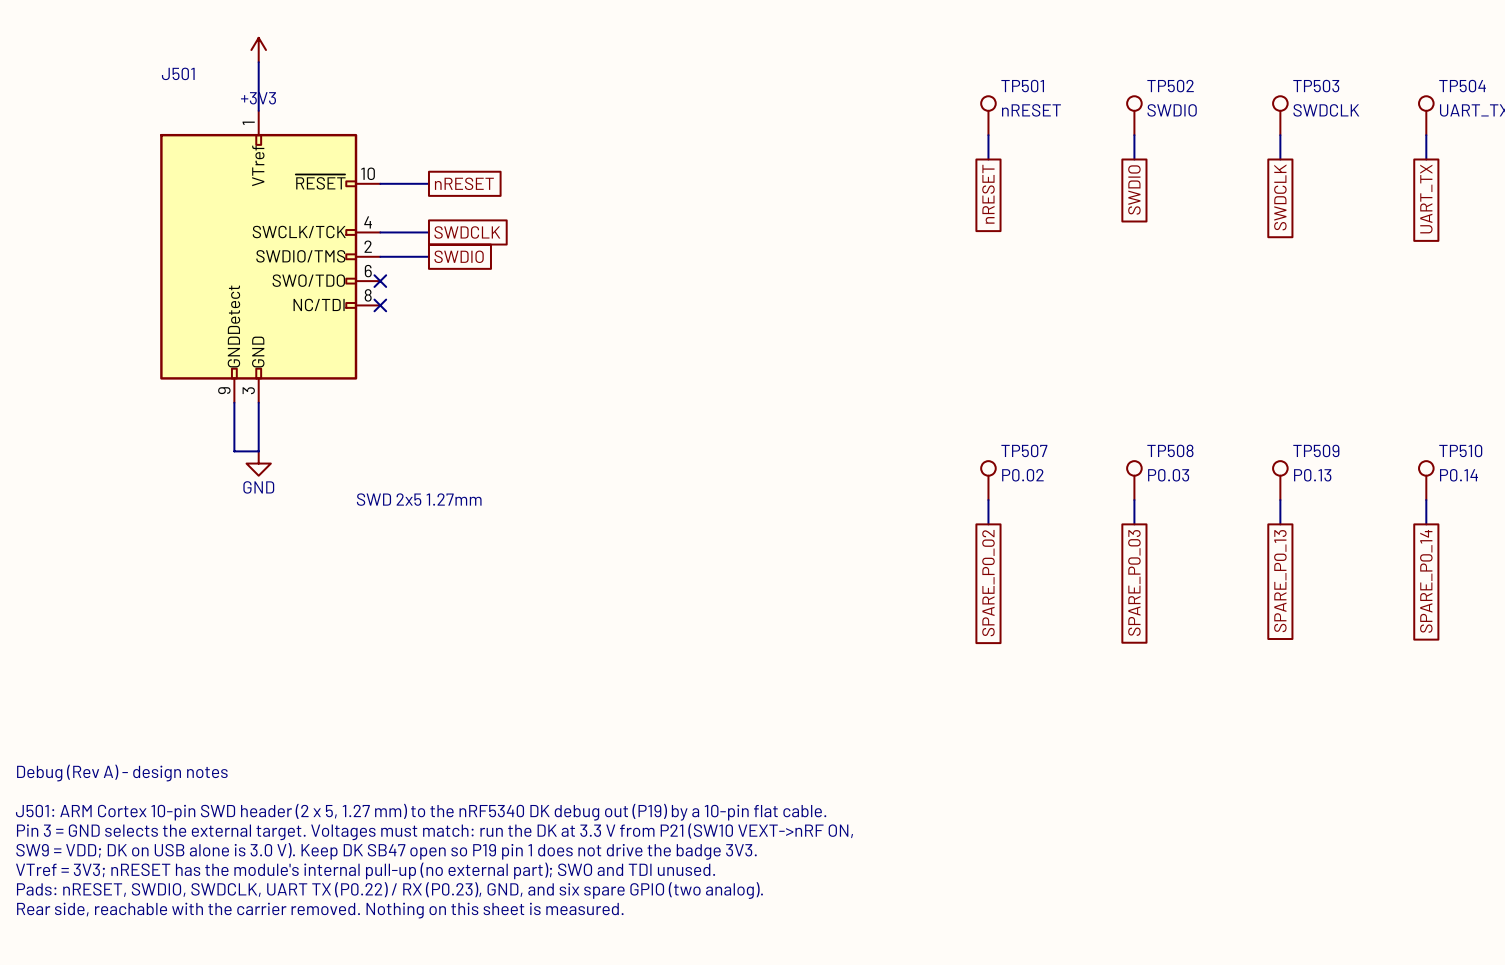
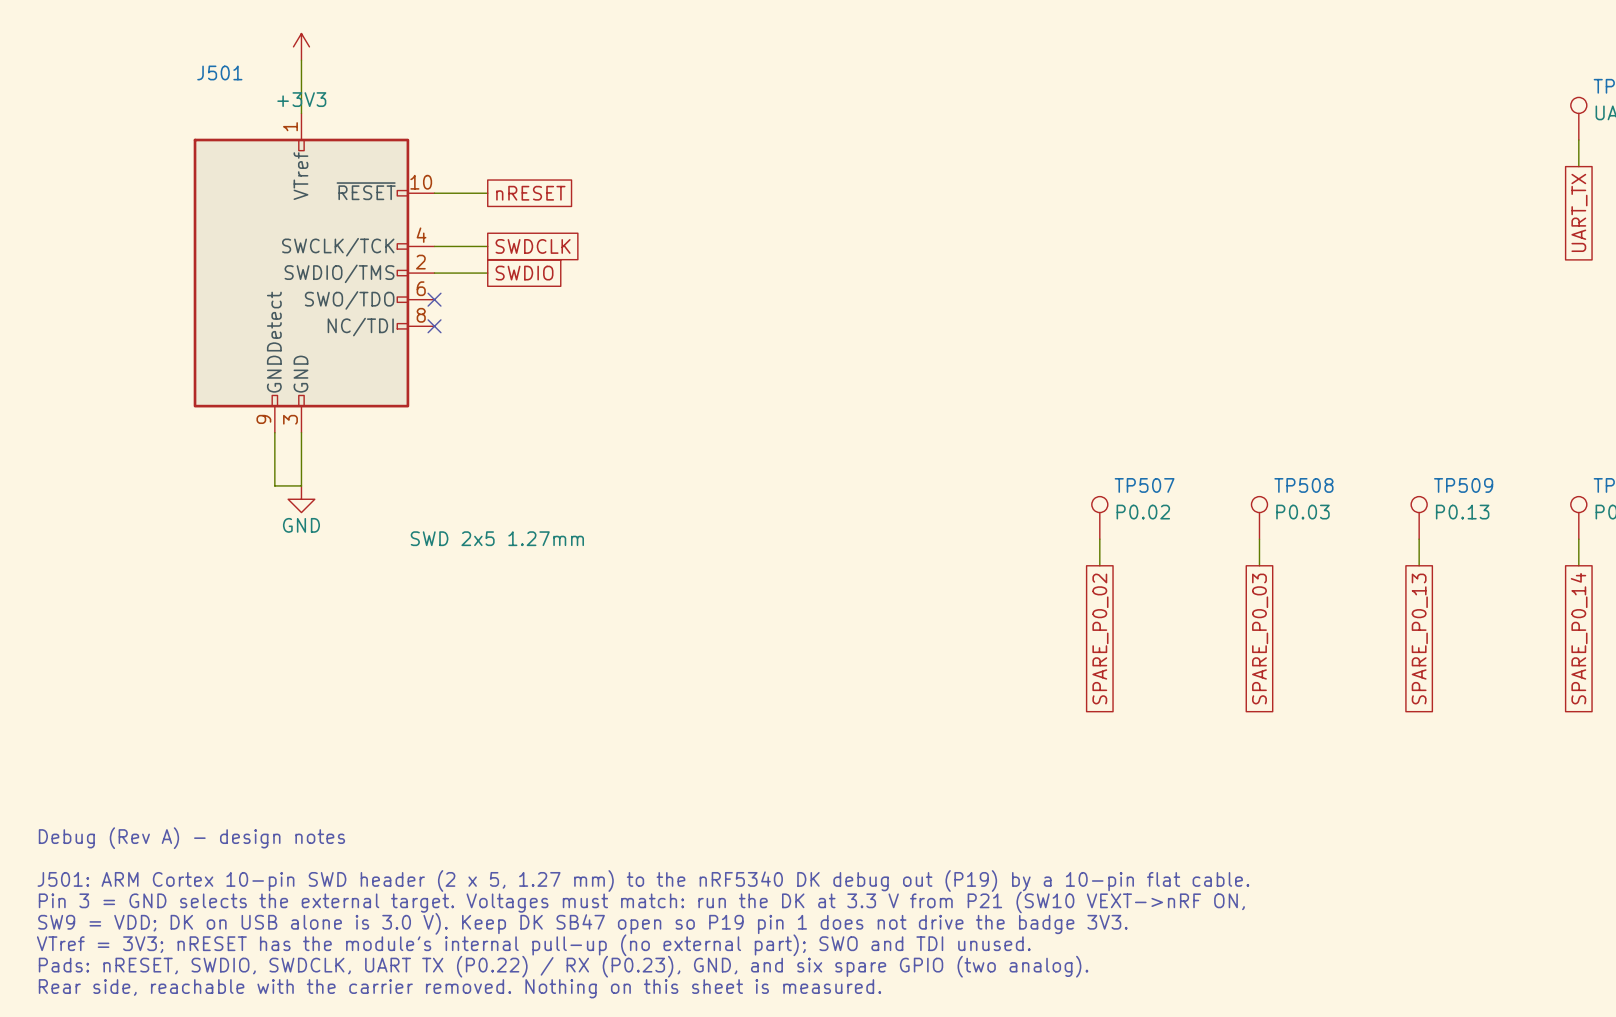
TP501: nRESET (988, 115) -> none
TP502: SWDIO (1134, 115) -> none
TP503: SWDCLK (1280, 115) -> none
wire: (988, 135) (988, 159) -> none
wire: (1134, 135) (1134, 159) -> none
wire: (1280, 135) (1280, 159) -> none
global label: SWDIO (1134, 189) -> none
global label: nRESET (988, 194) -> none
global label: SWDCLK (1280, 197) -> none

